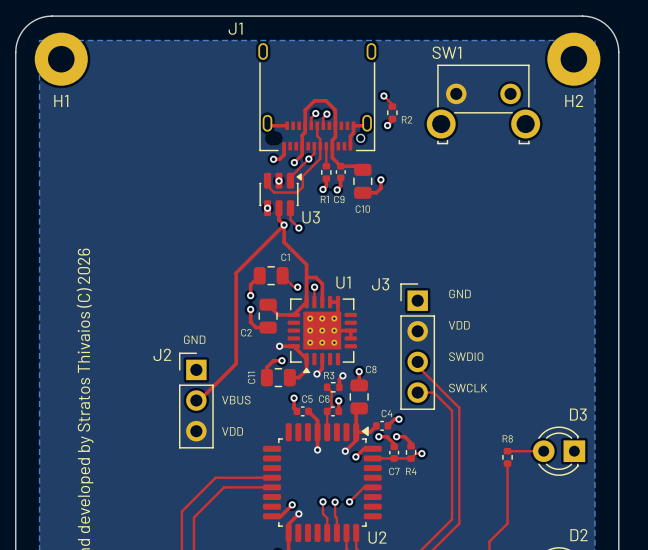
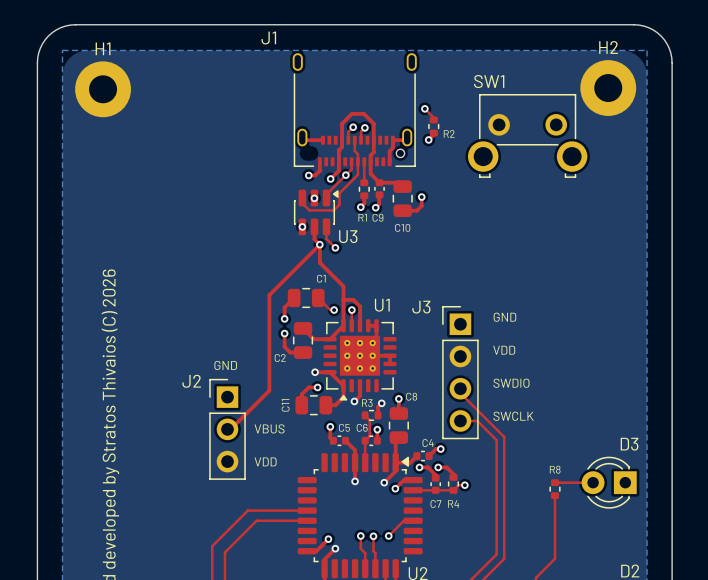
H1 position: (61, 59) -> (103, 89)
H2 position: (573, 59) -> (608, 88)
H1 name position: H1 (61, 100) -> H1 (103, 48)
H2 name position: H2 (574, 100) -> H2 (608, 47)
SW1 position: (483, 104) -> (527, 135)

